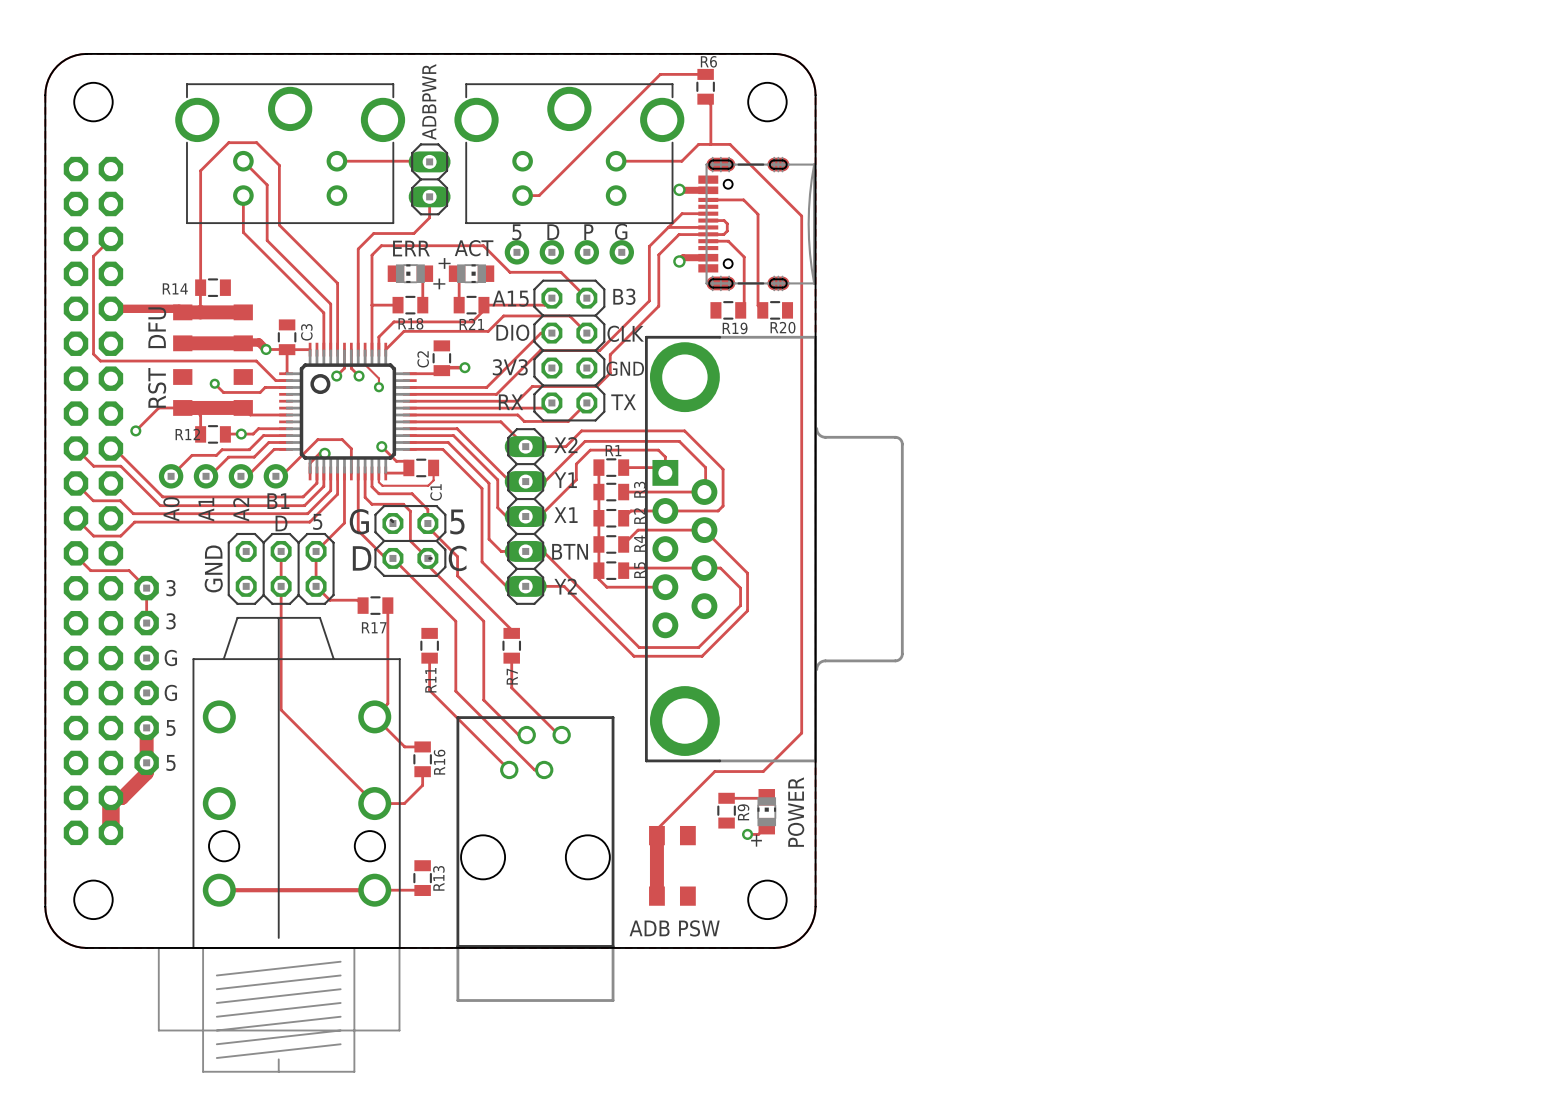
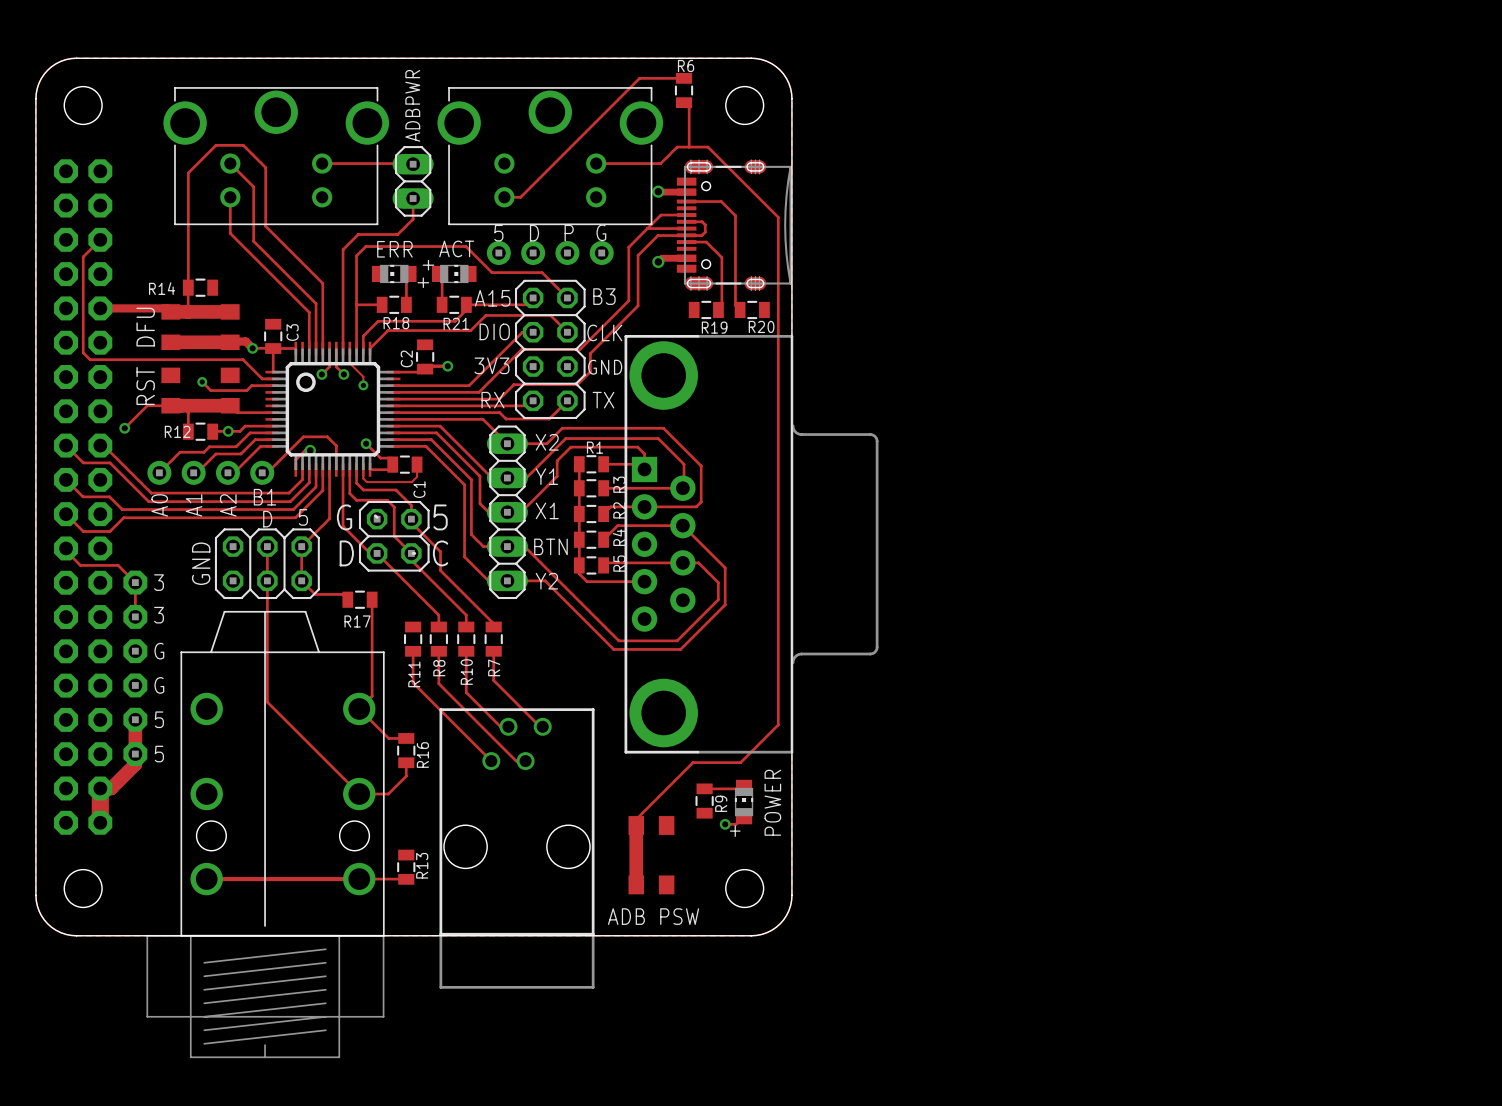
track: (455, 633) (455, 658) -> none
track: (483, 633) (483, 658) -> none
R8: none -> (438, 639)
R10: none -> (466, 639)

